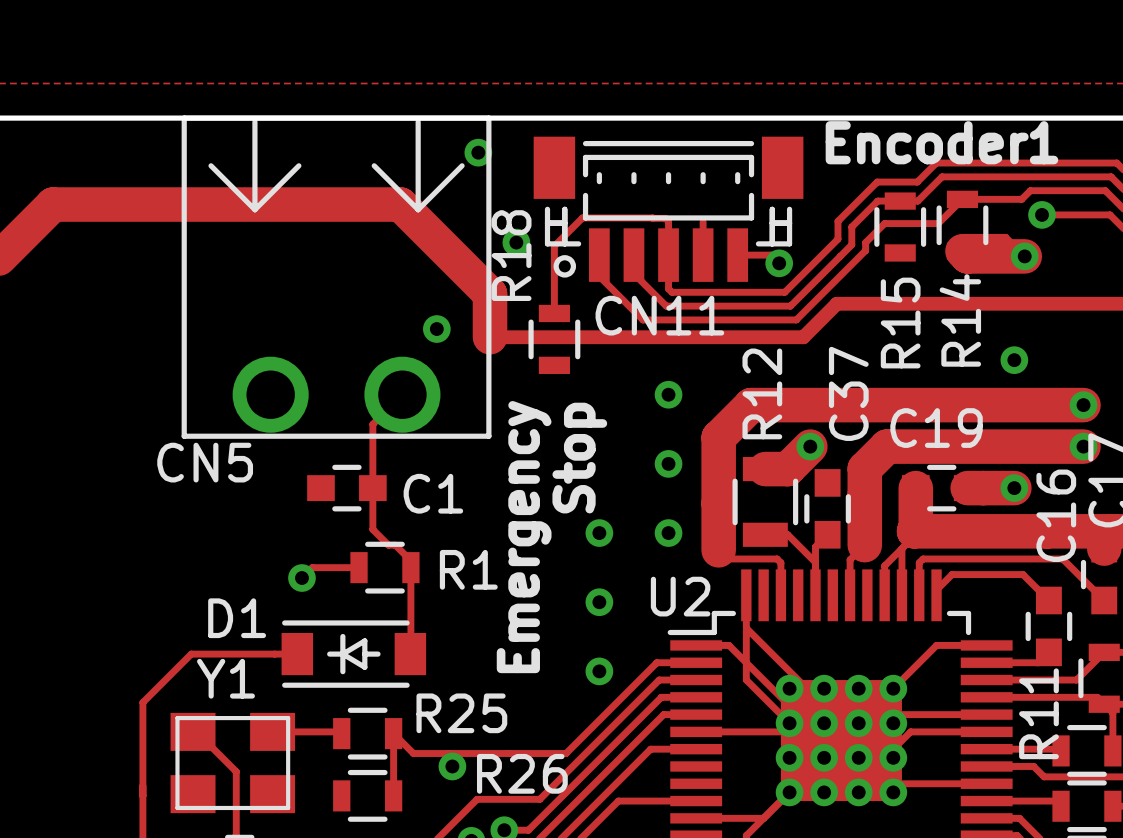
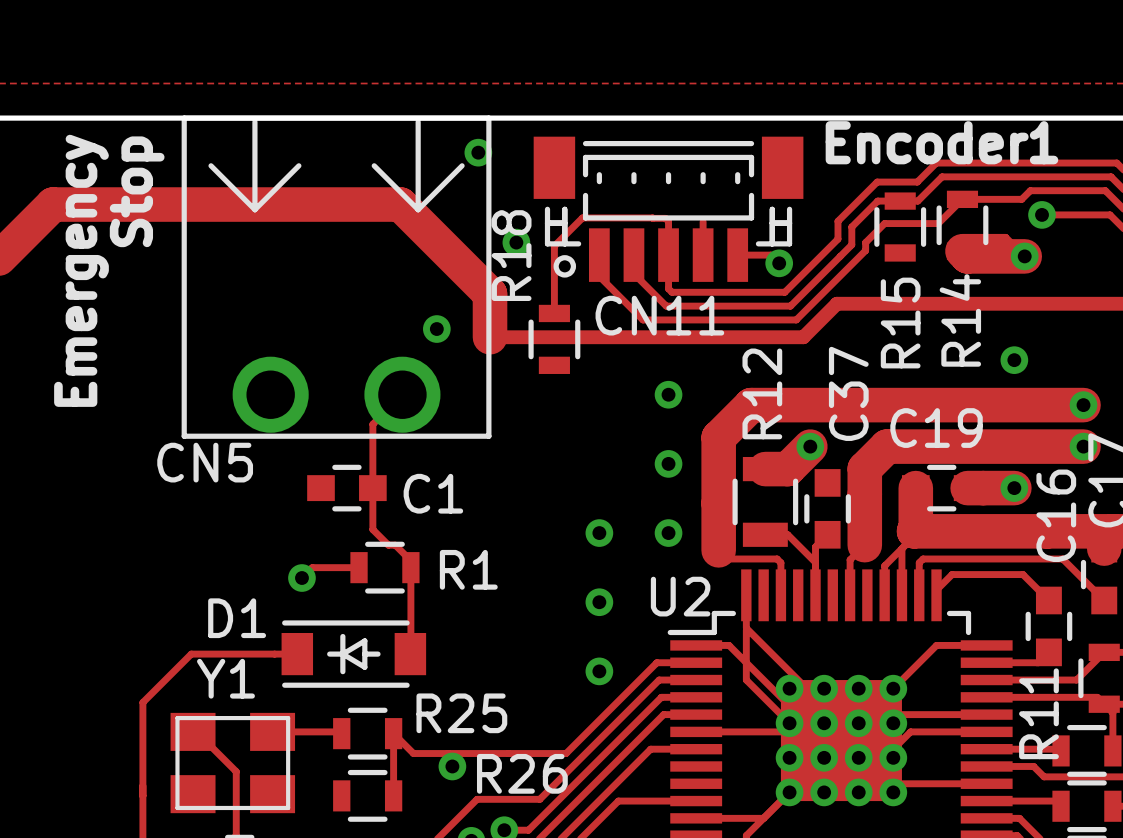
text position: Stop (579, 458) -> Stop (137, 191)
text position: Emergency (524, 537) -> Emergency (81, 270)

